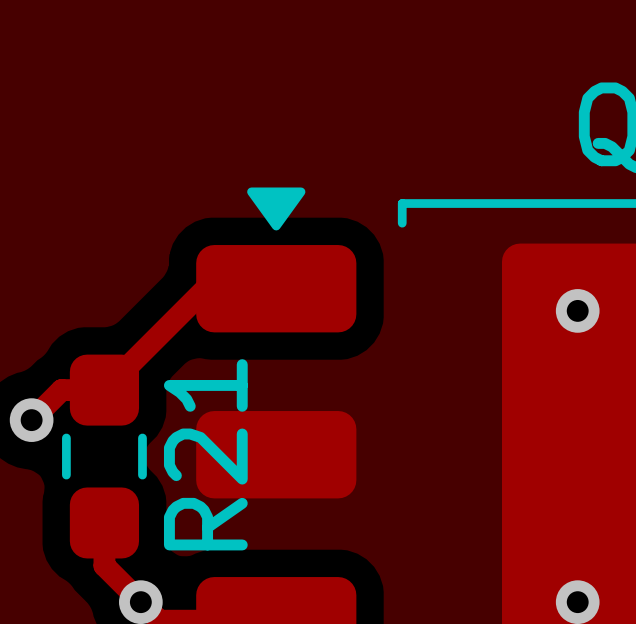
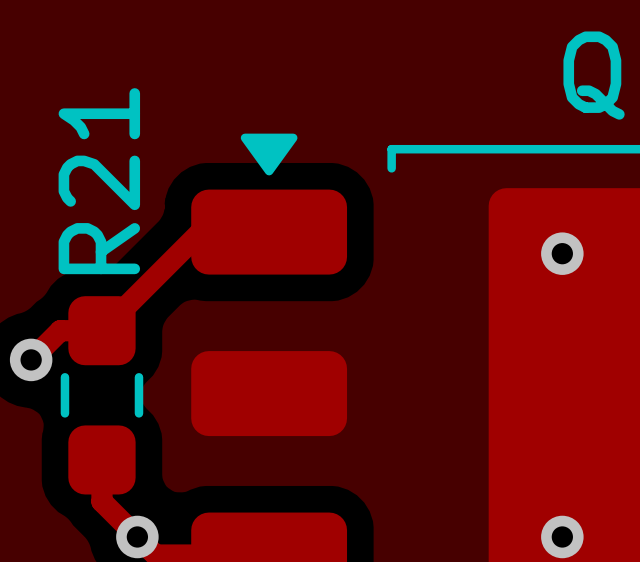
R21 name position: R21 (205, 454) -> R21 (99, 181)

